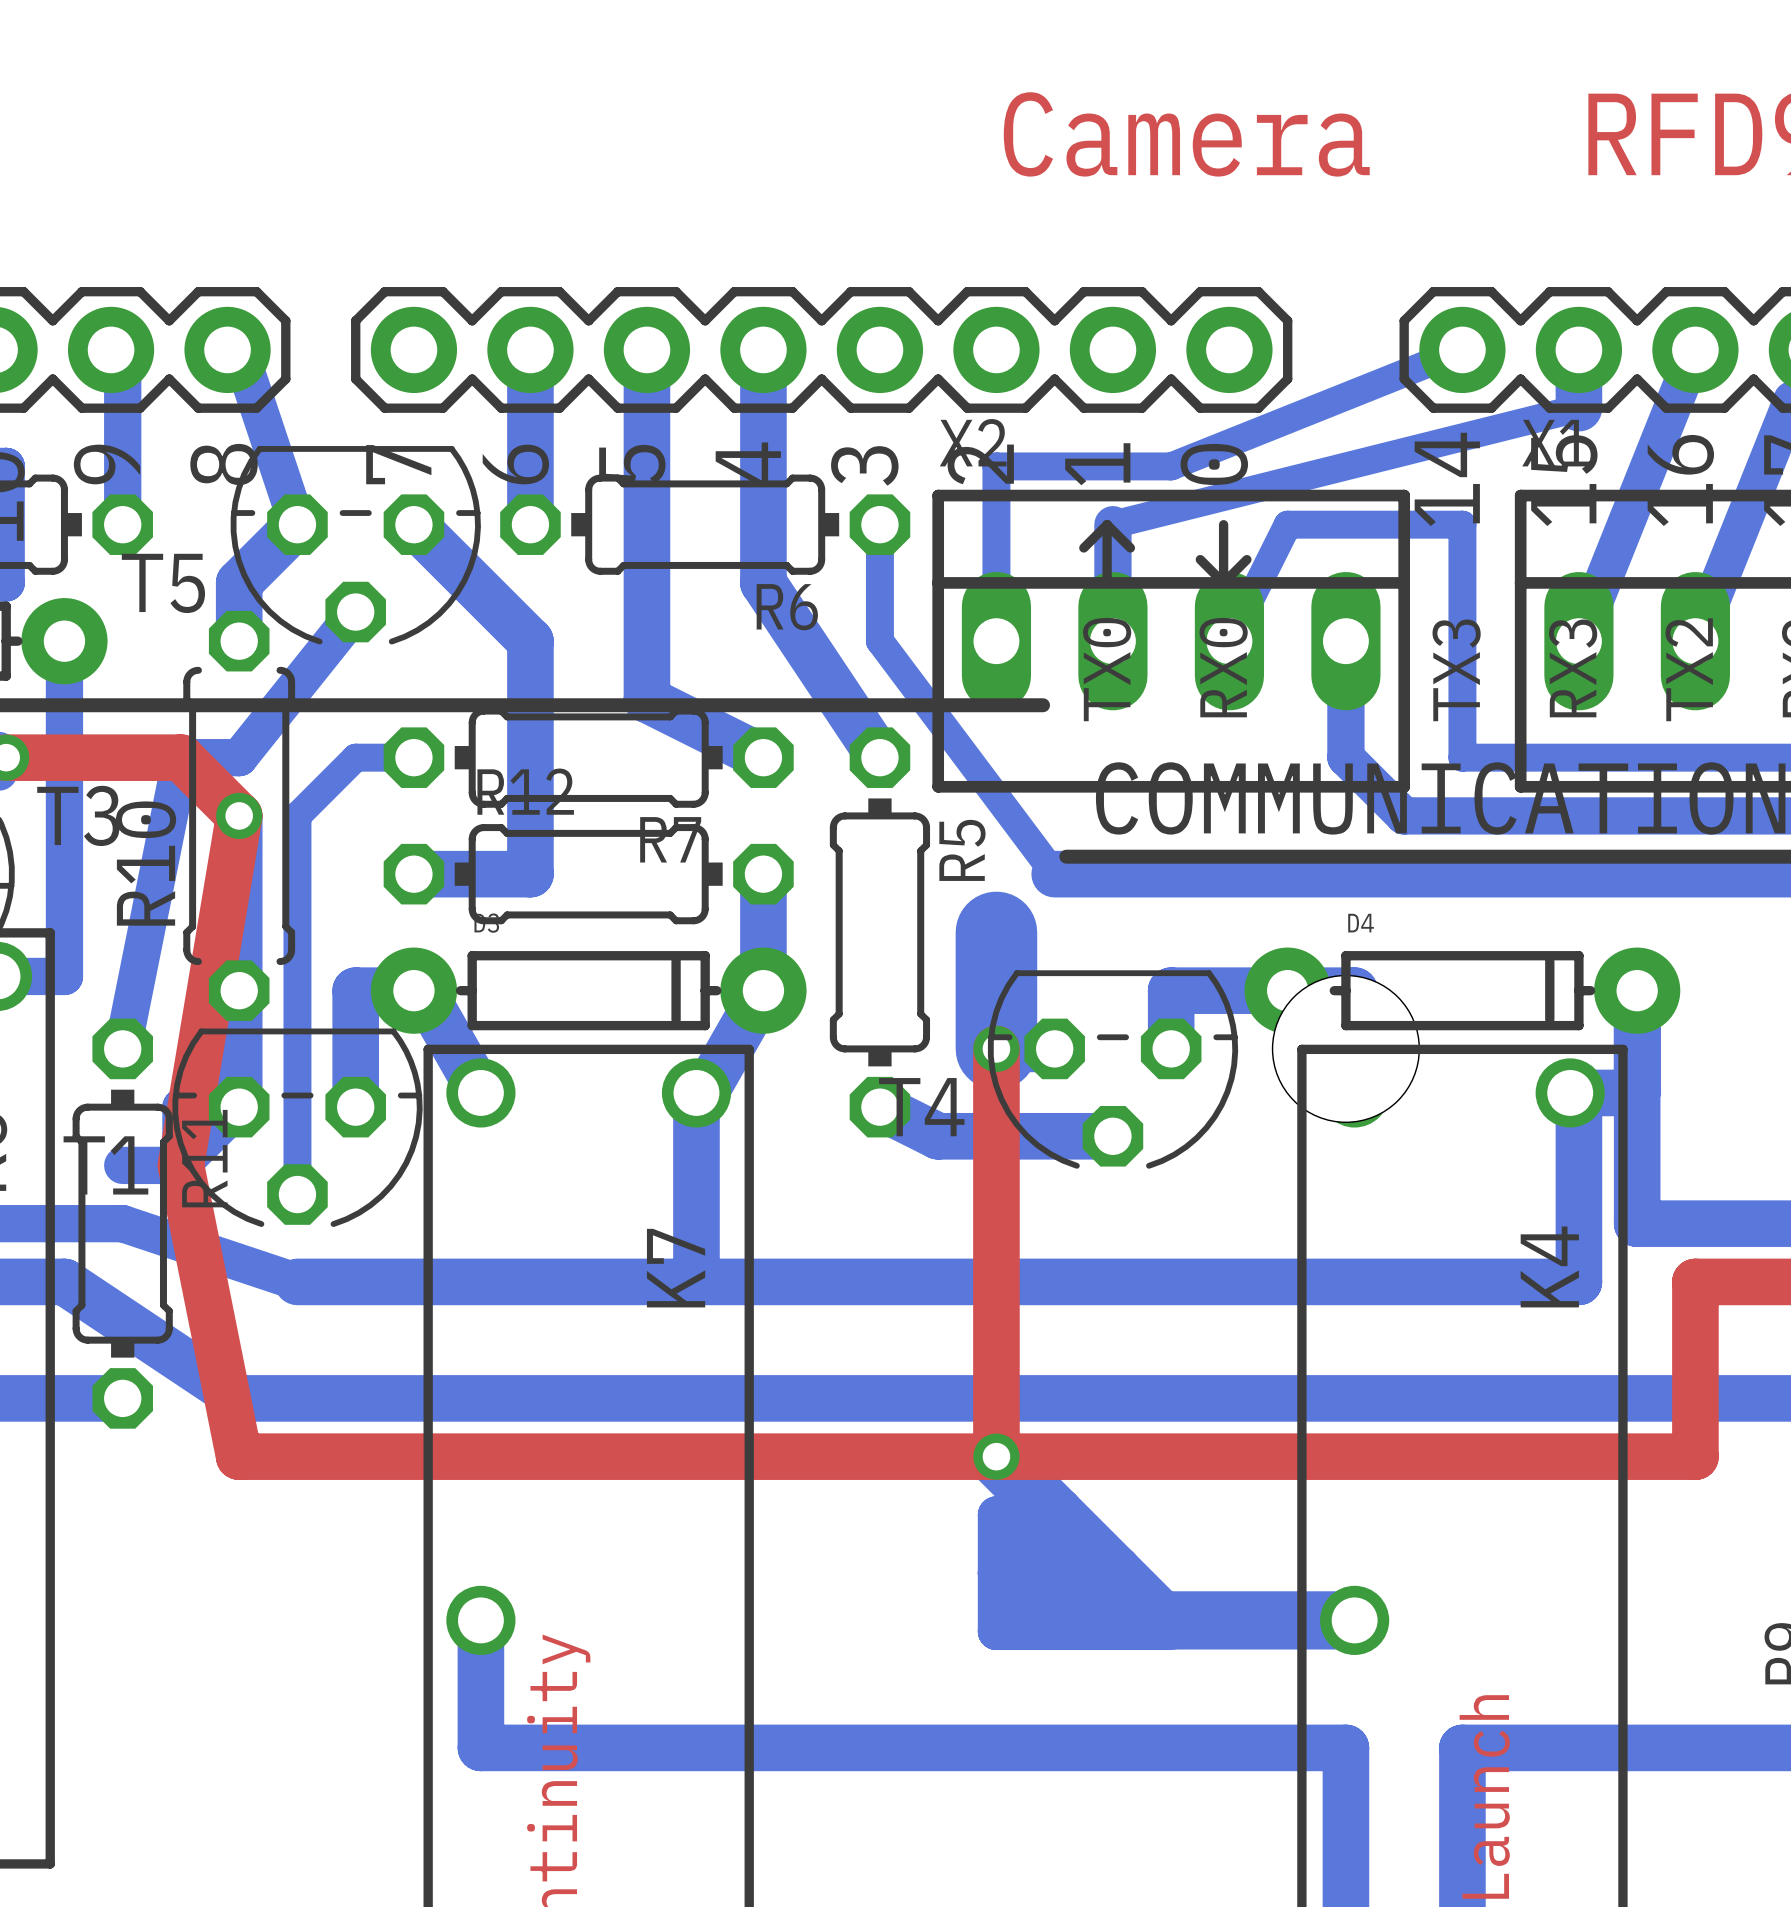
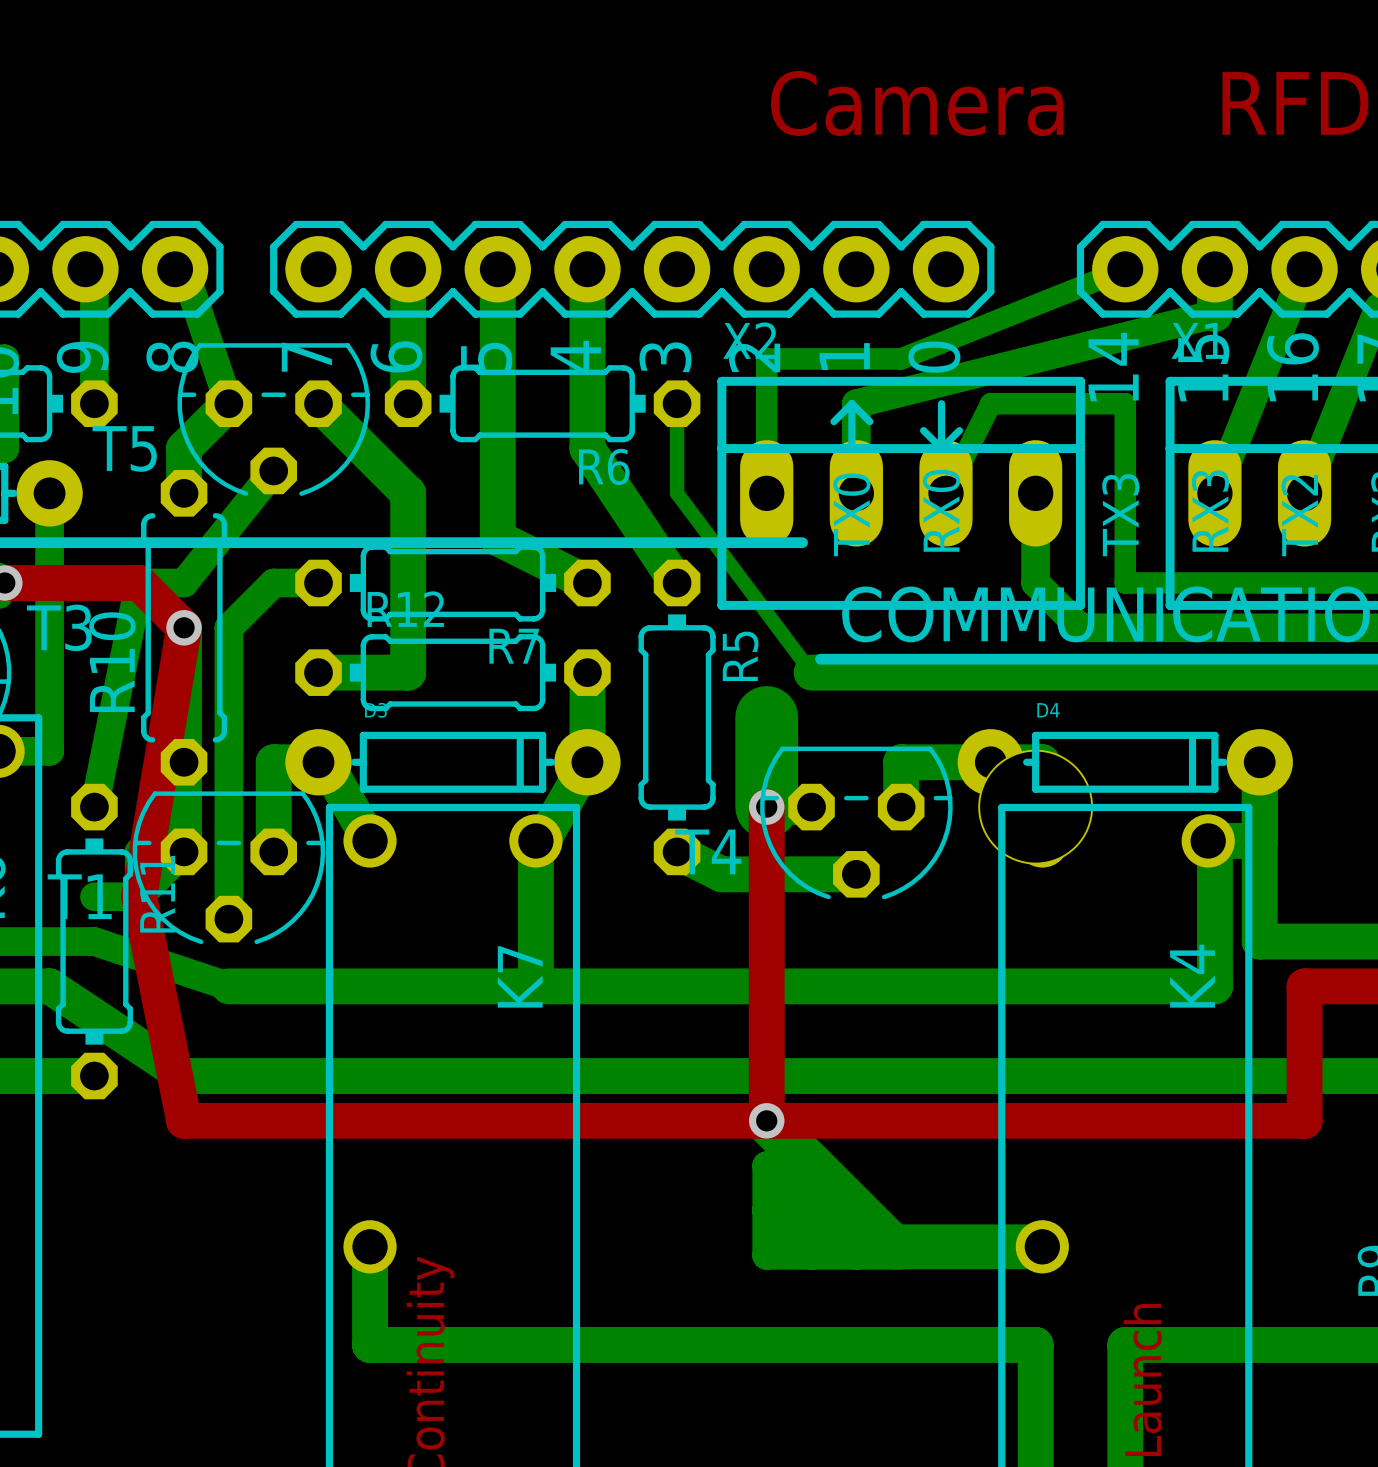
bottom track width: thin (1578, 408) (1112, 524) -> thick (1214, 314) (856, 403)
bottom track width: thick (879, 524) (879, 641) (1054, 874) -> thin (677, 403) (677, 493) (811, 672)
bottom track width: thin (413, 757) (355, 757) (297, 815) (297, 1194) -> thick (318, 582) (273, 582) (228, 627) (228, 919)

